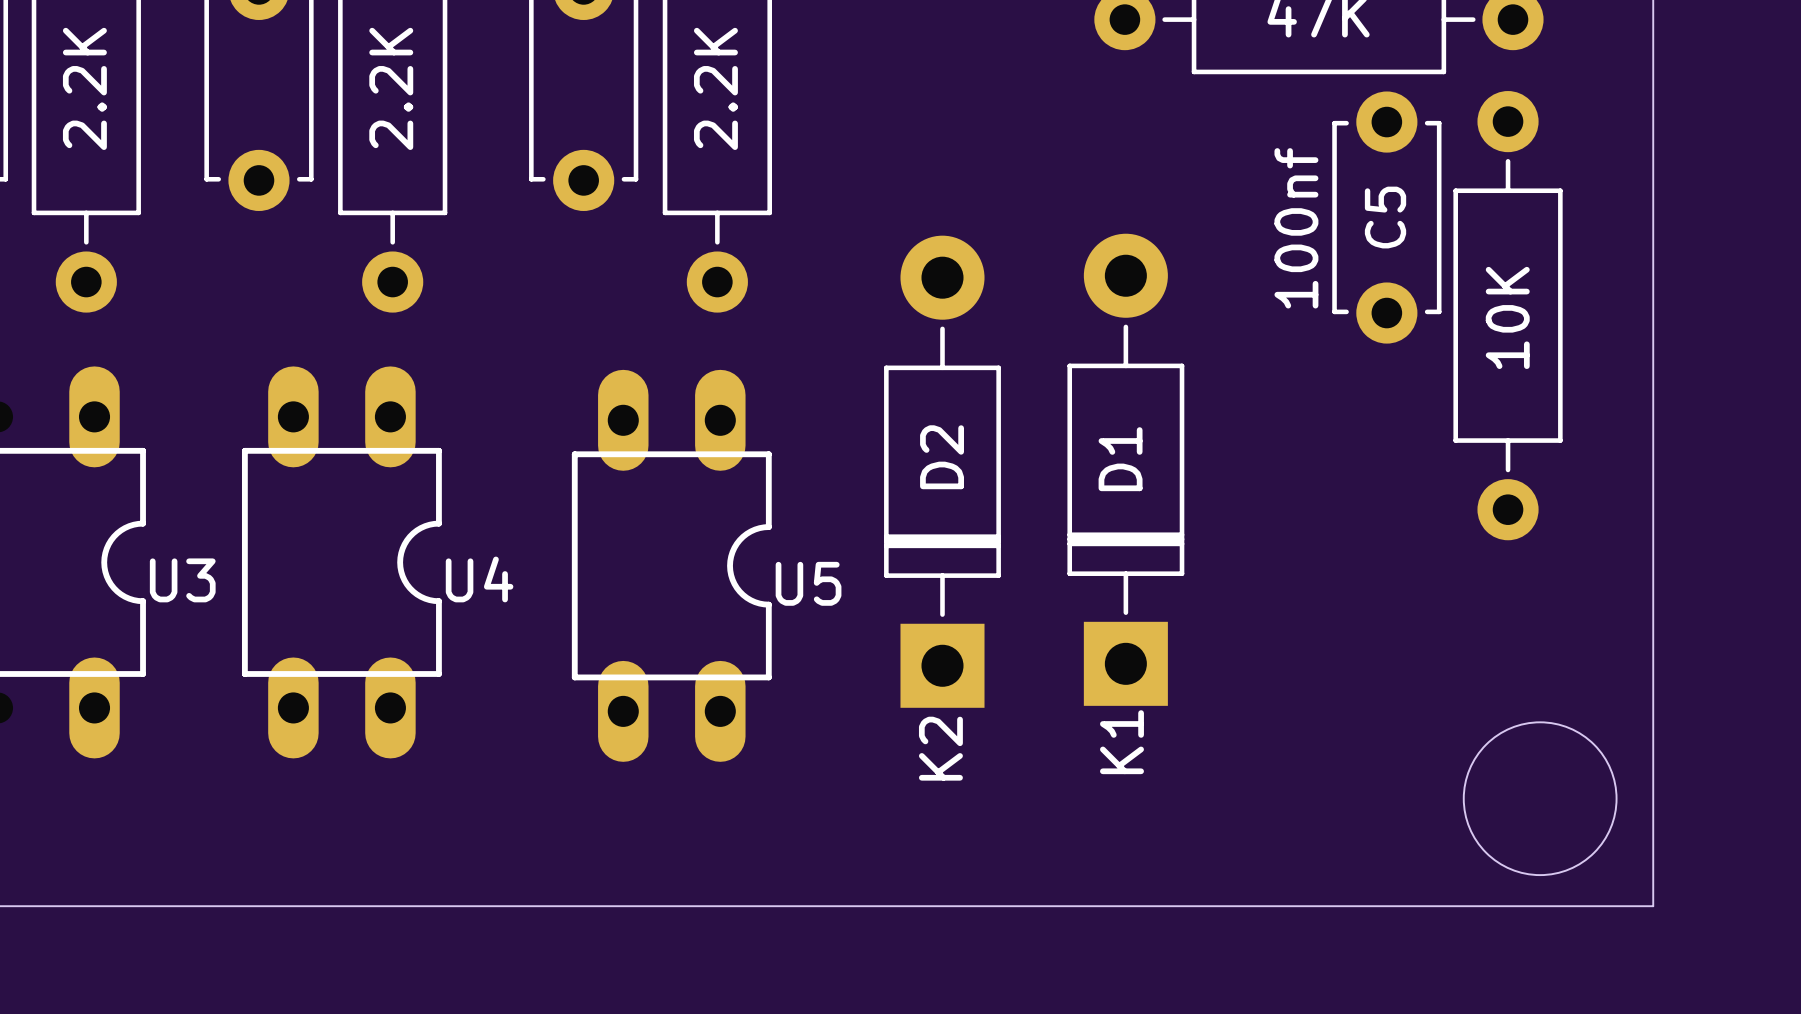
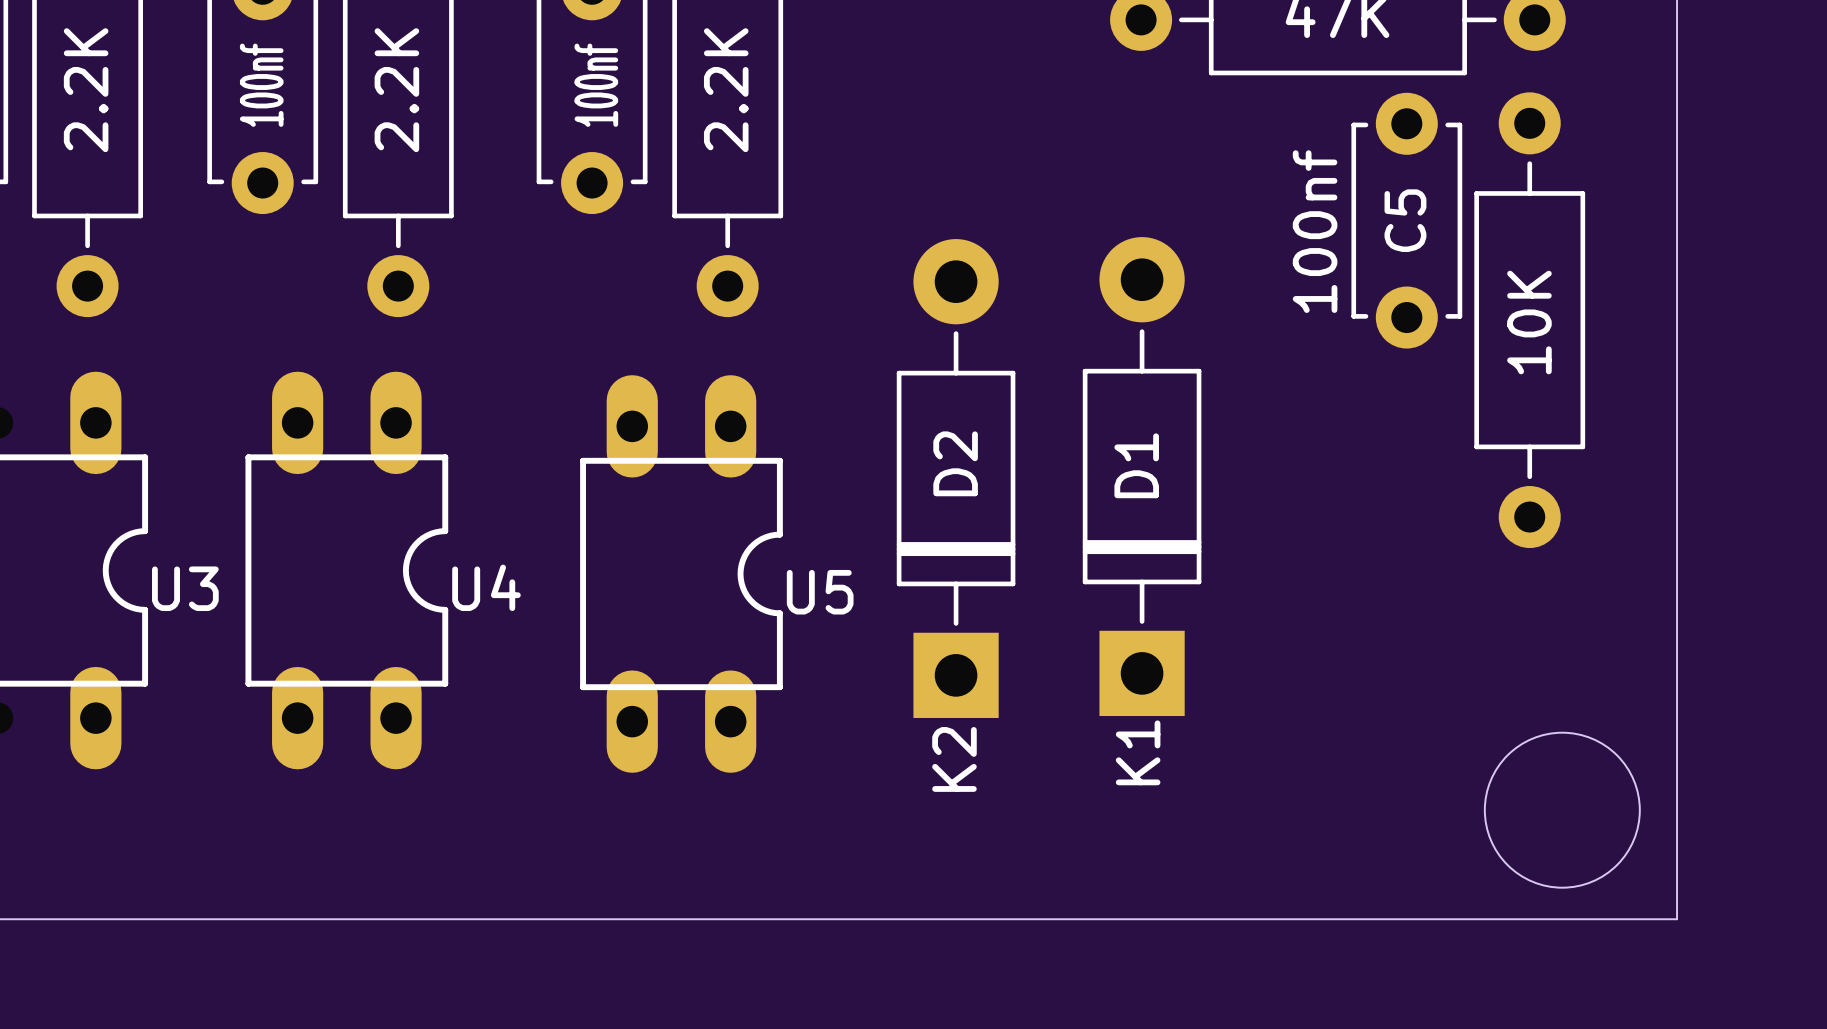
part value: none -> 100nf (261, 85)
part value: none -> 100nf (596, 85)

